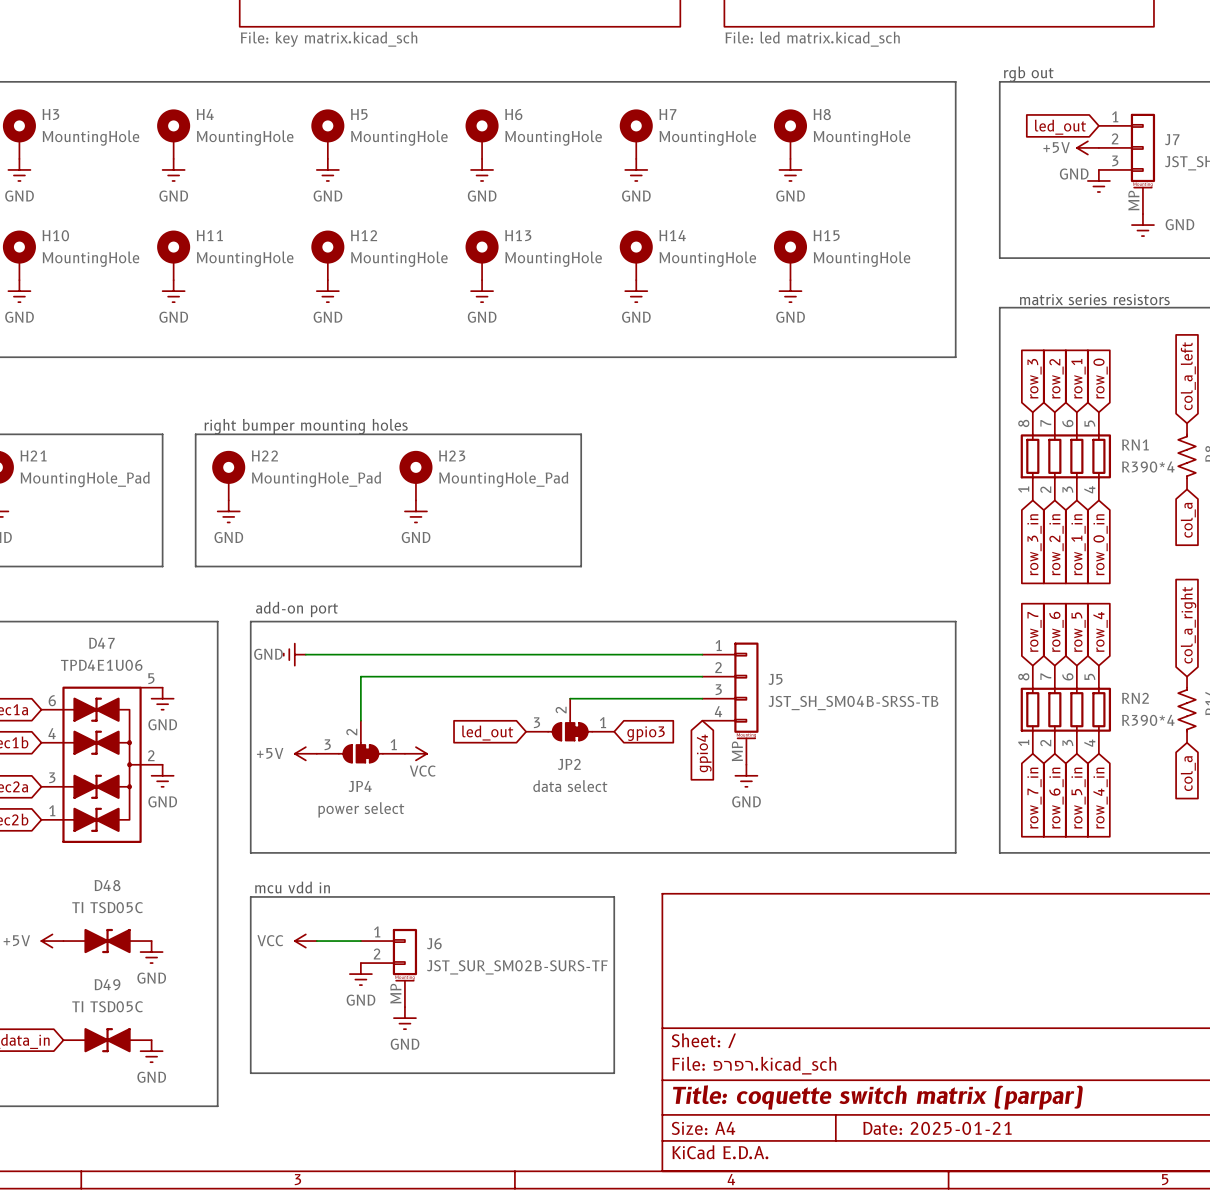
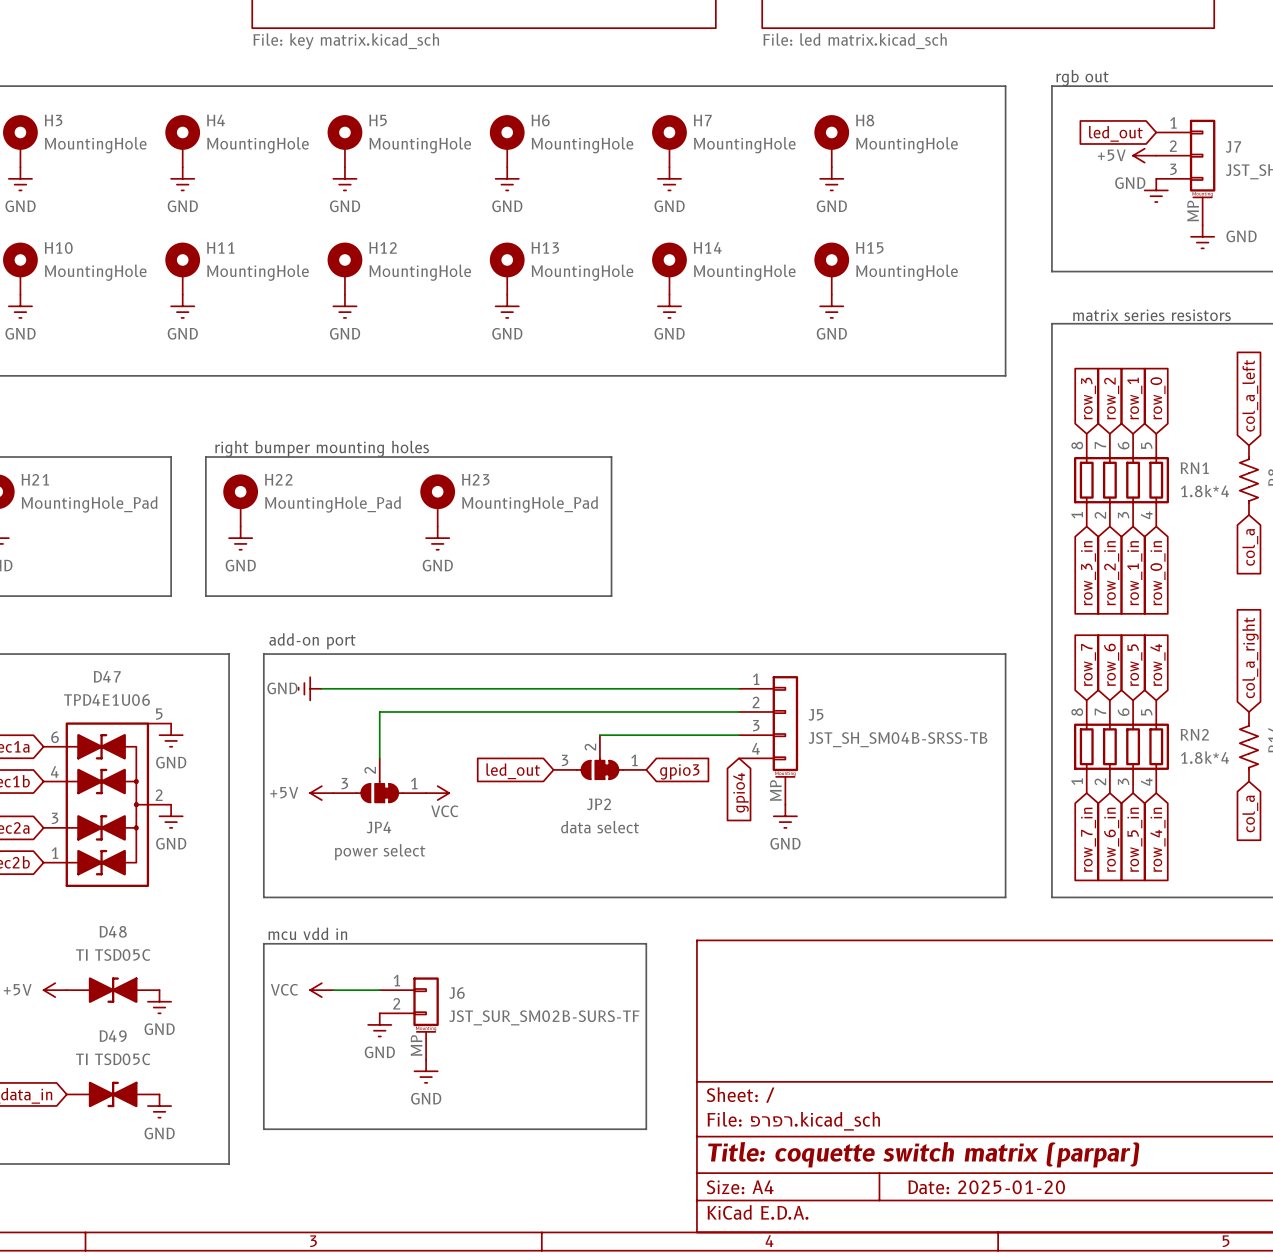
RN1 value: R390*4 (1148, 467) -> 1.8k*4 (1204, 491)
RN2 value: R390*4 (1148, 720) -> 1.8k*4 (1204, 757)
title block: Date: 2025-01-21 (937, 1128) -> Date: 2025-01-20 (986, 1187)

